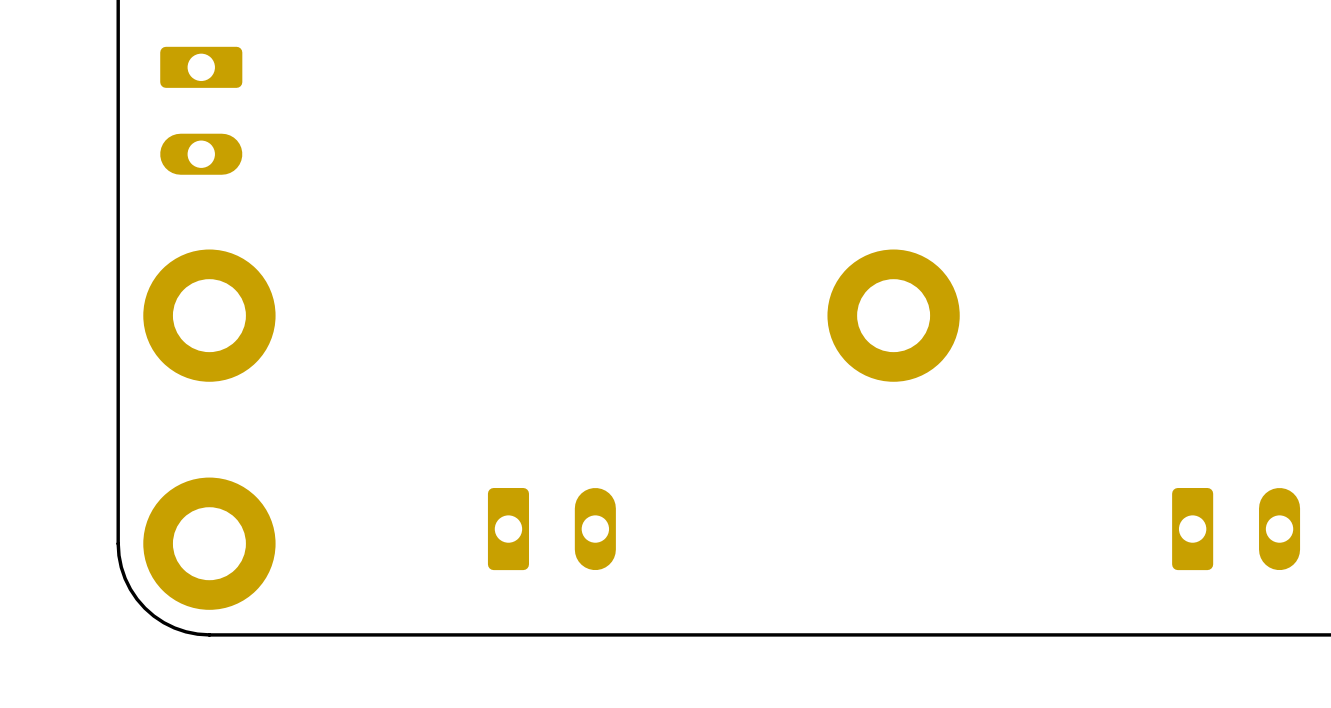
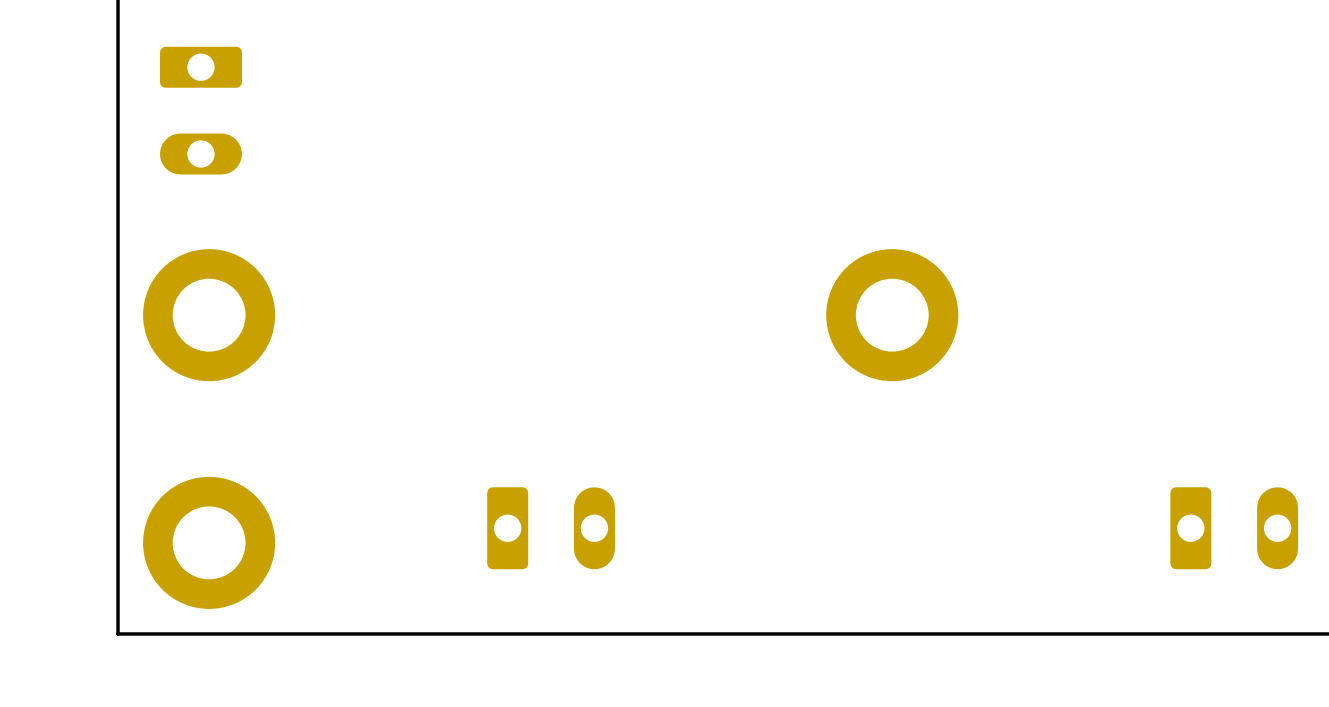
board edge: (118, 543) (121, 567) (125, 578) (130, 589) (144, 608) (153, 616) (174, 627) (197, 634) (209, 634) -> (118, 542) (118, 633) (209, 633)

